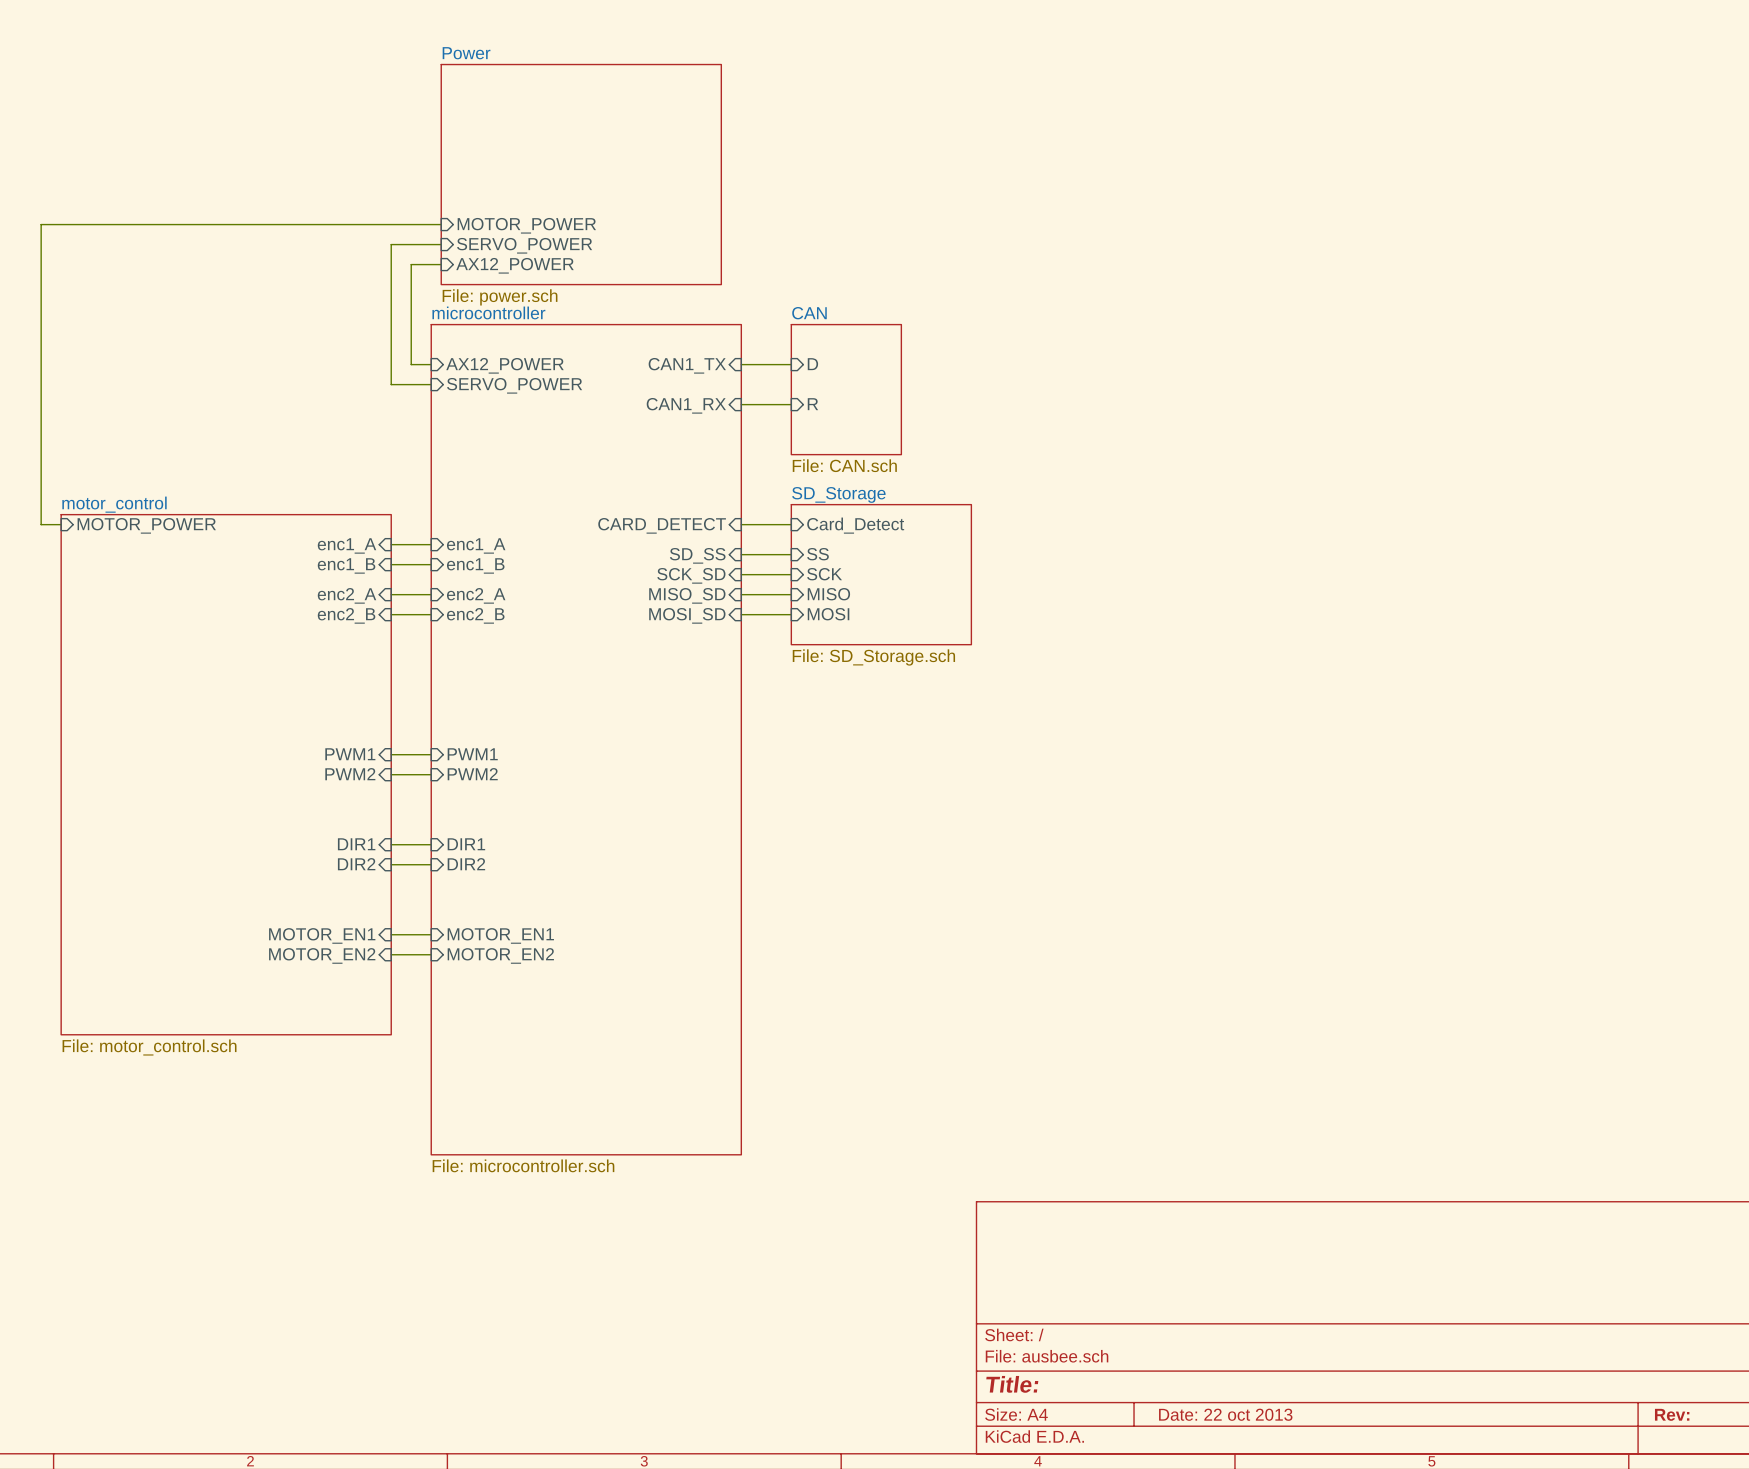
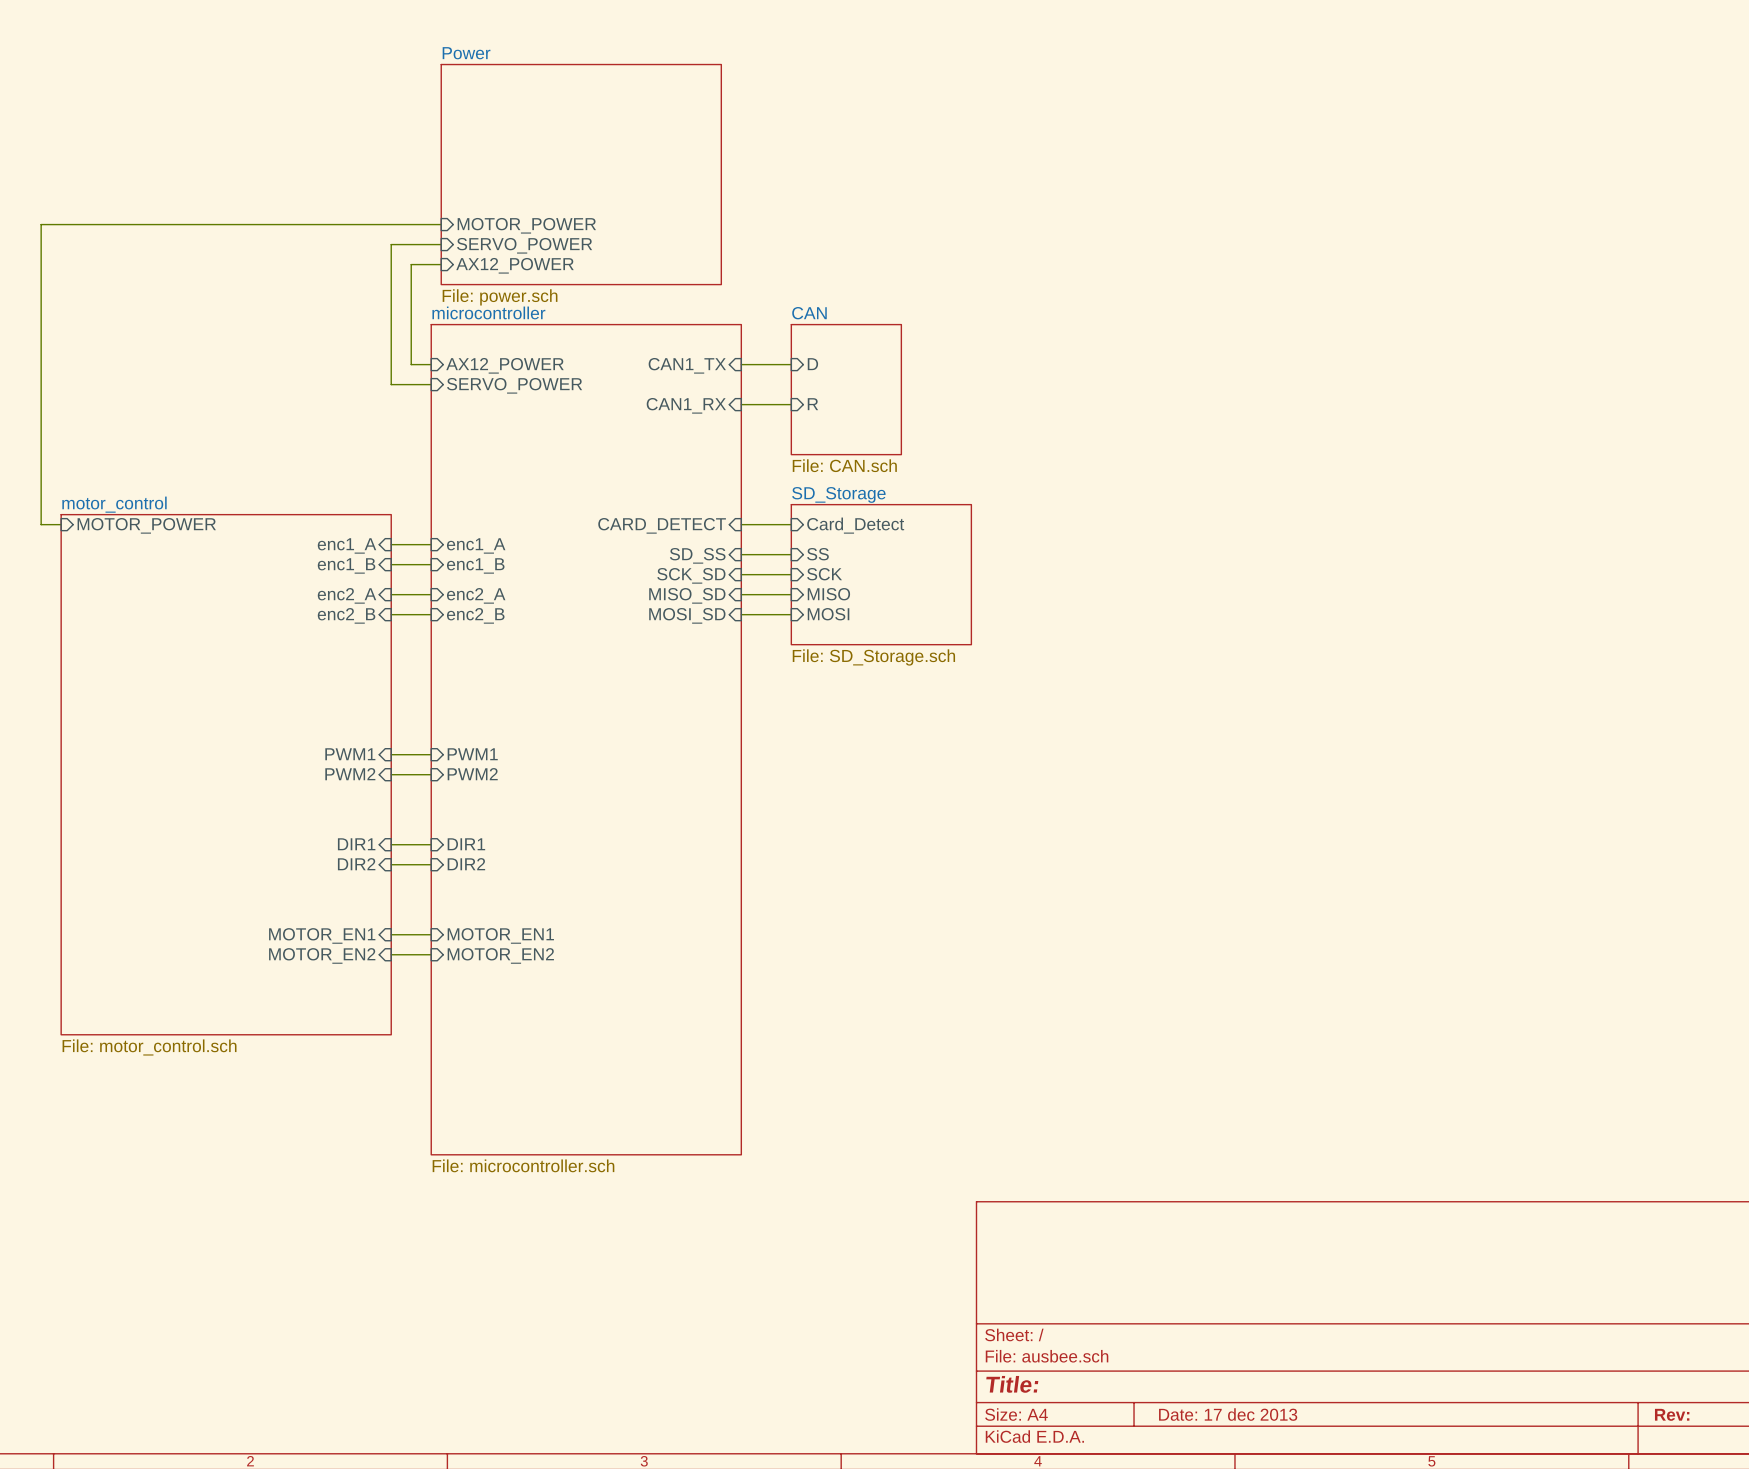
title block: Date: 22 oct 2013 (1225, 1414) -> Date: 17 dec 2013 (1228, 1414)

